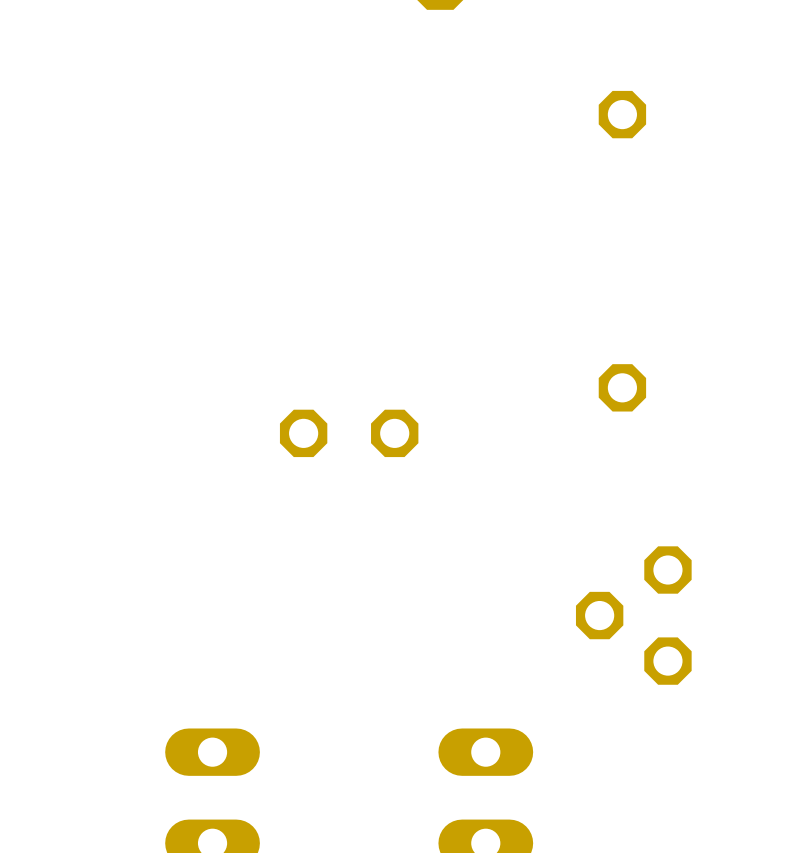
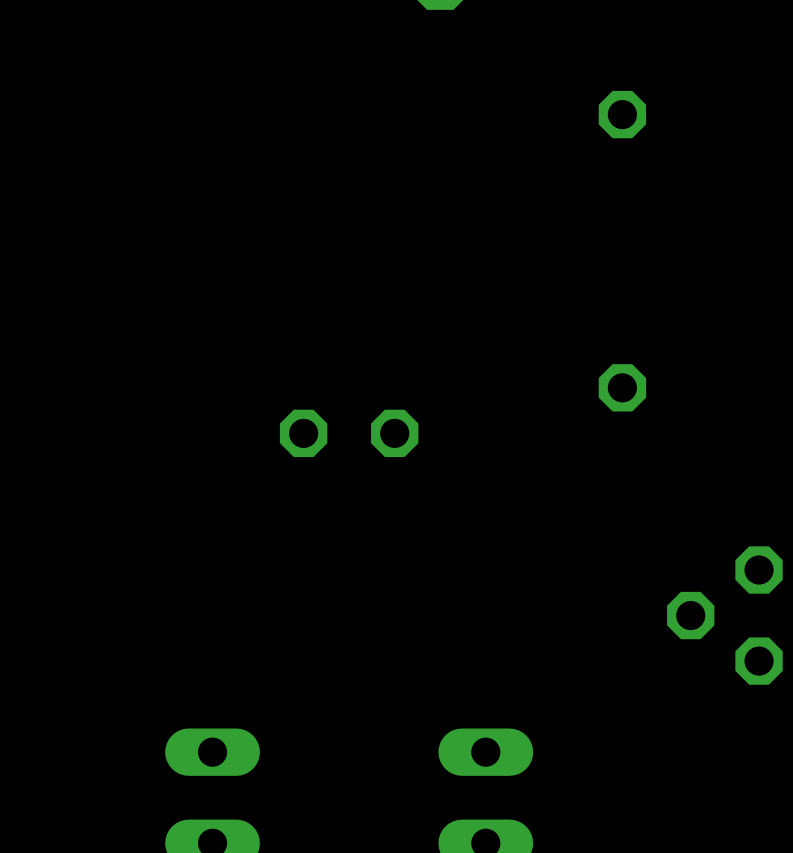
part position: (633, 615) -> (724, 615)

